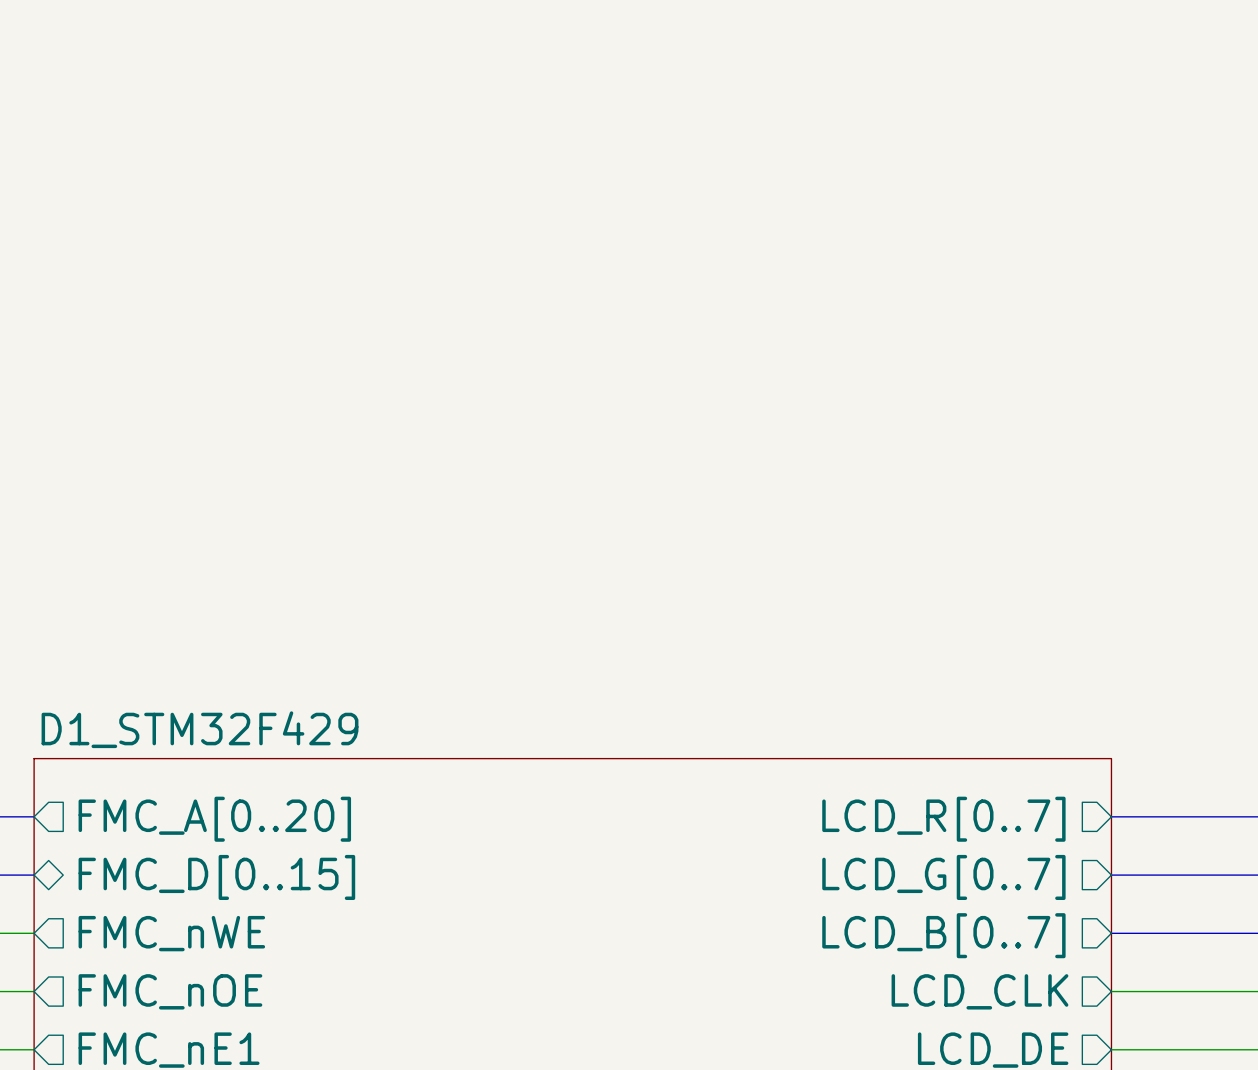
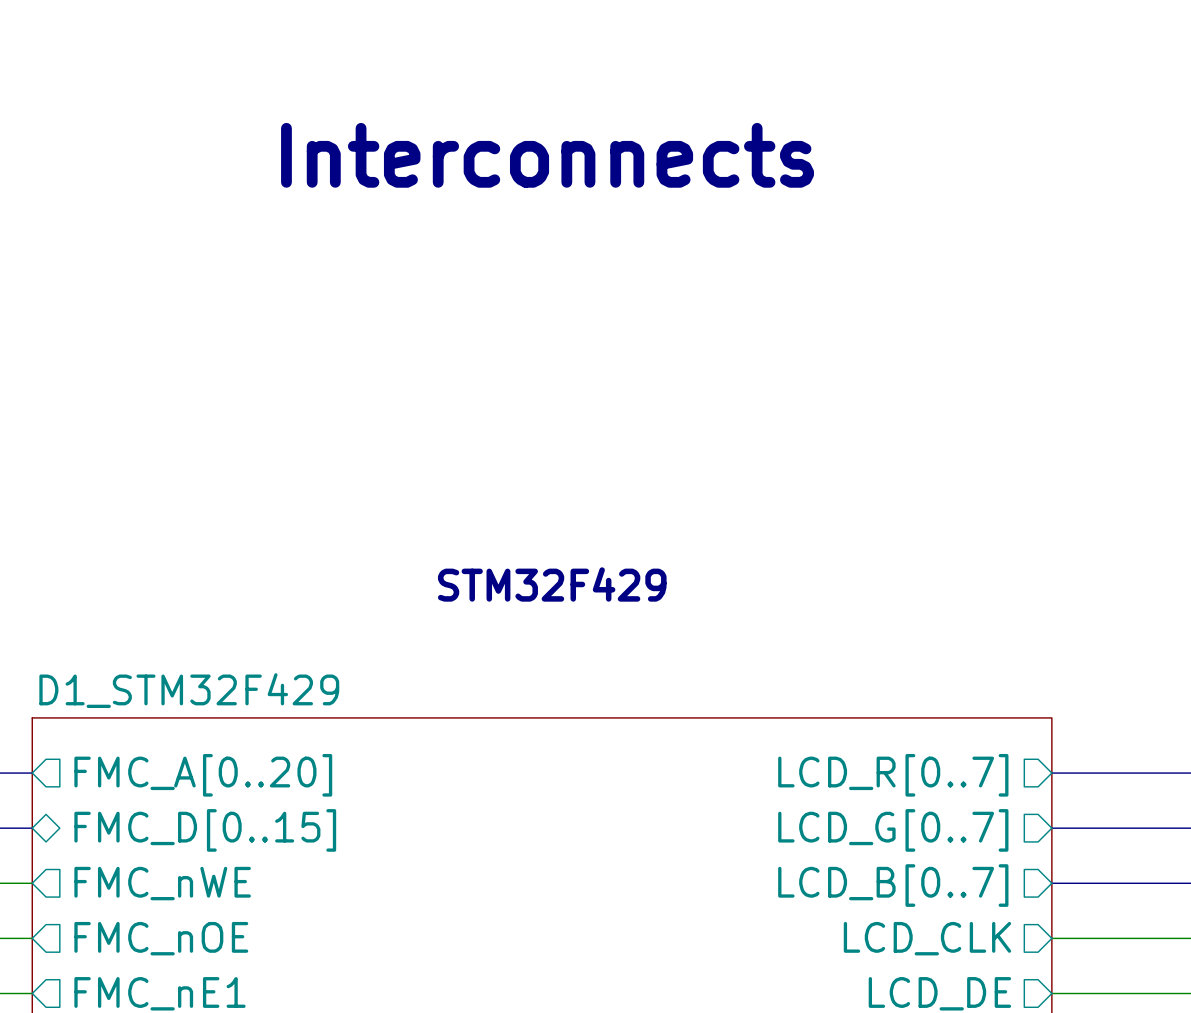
text: none -> Interconnects (547, 155)
text: none -> STM32F429 (552, 584)

